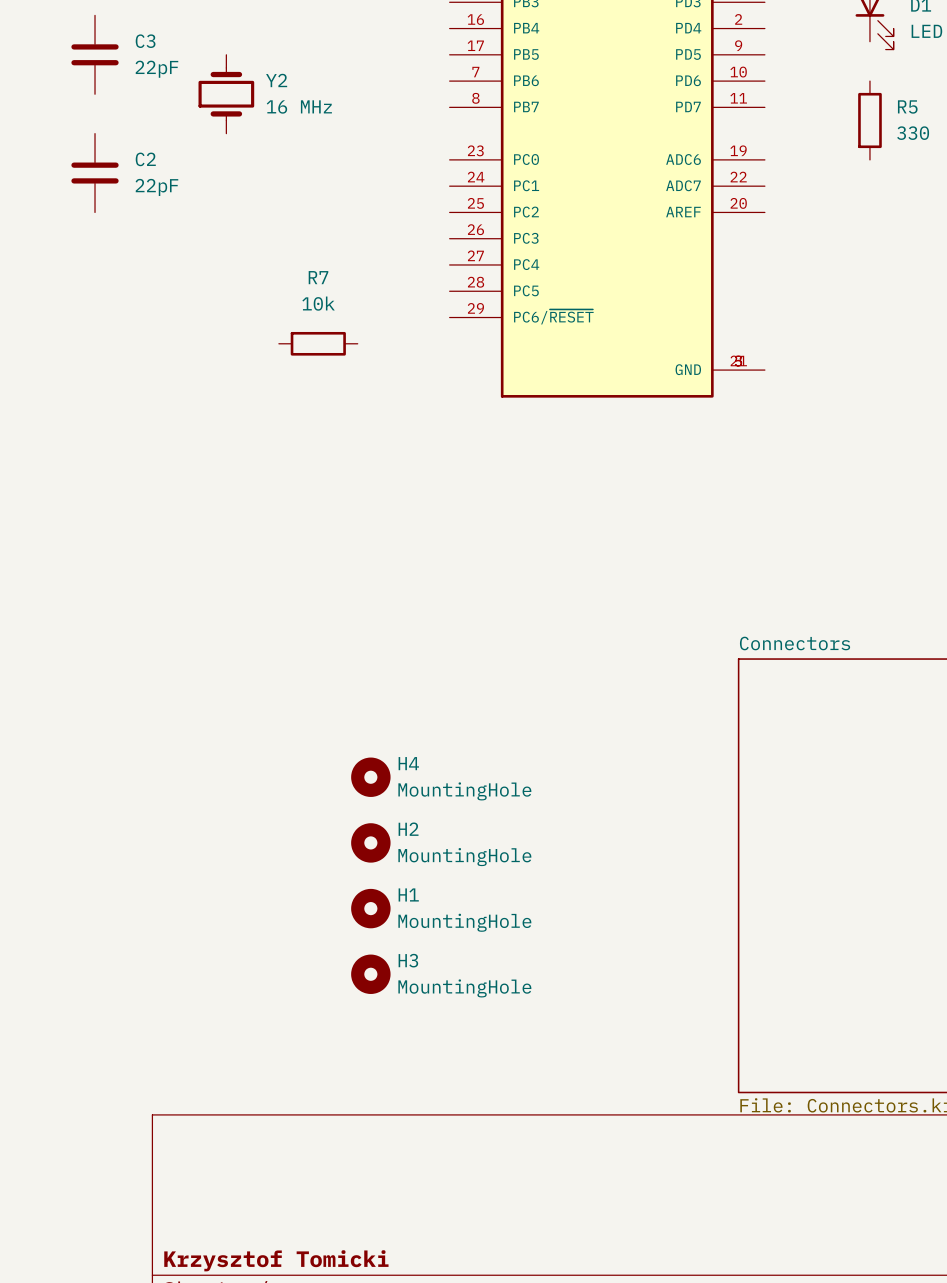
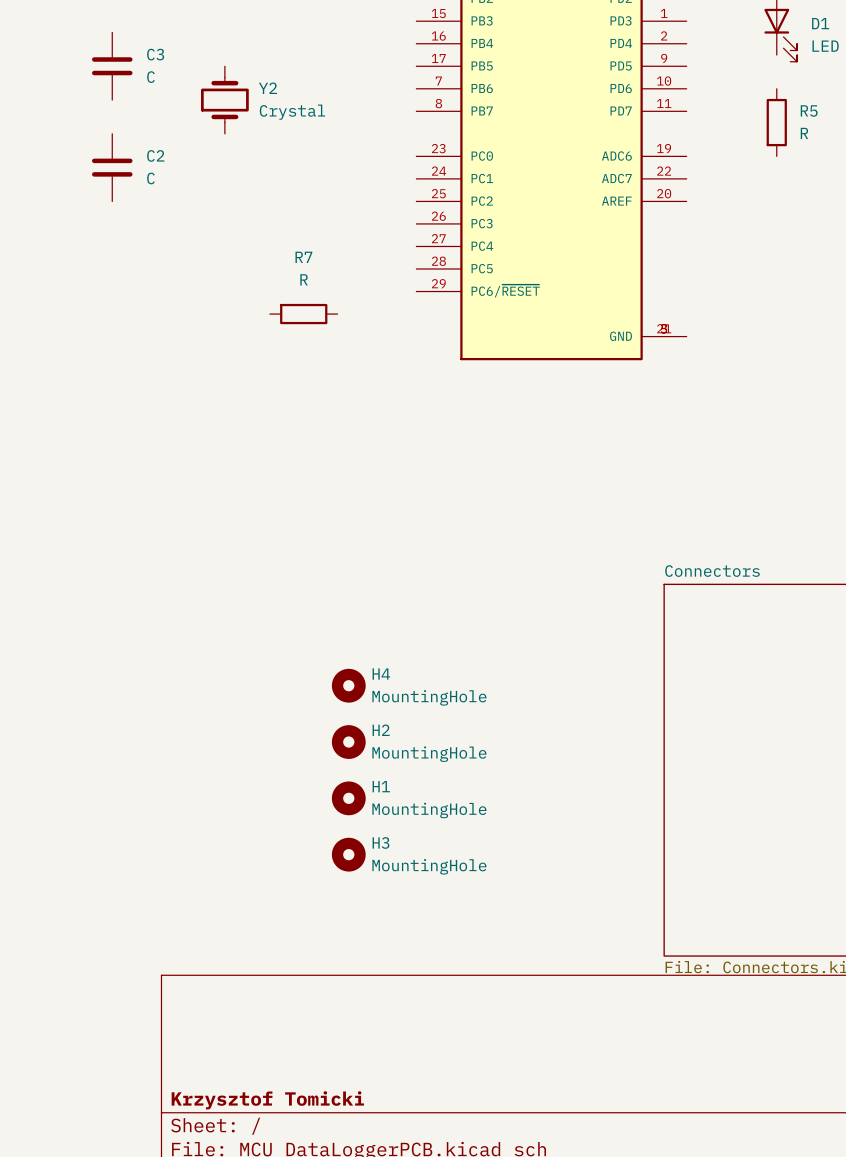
C3 value: 22pF (156, 69) -> C (150, 77)
Y2 value: 16 MHz (299, 106) -> Crystal (292, 112)
R5 value: 330 (913, 133) -> R (804, 133)
C2 value: 22pF (156, 187) -> C (150, 178)
R7 value: 10k (318, 303) -> R (304, 279)

